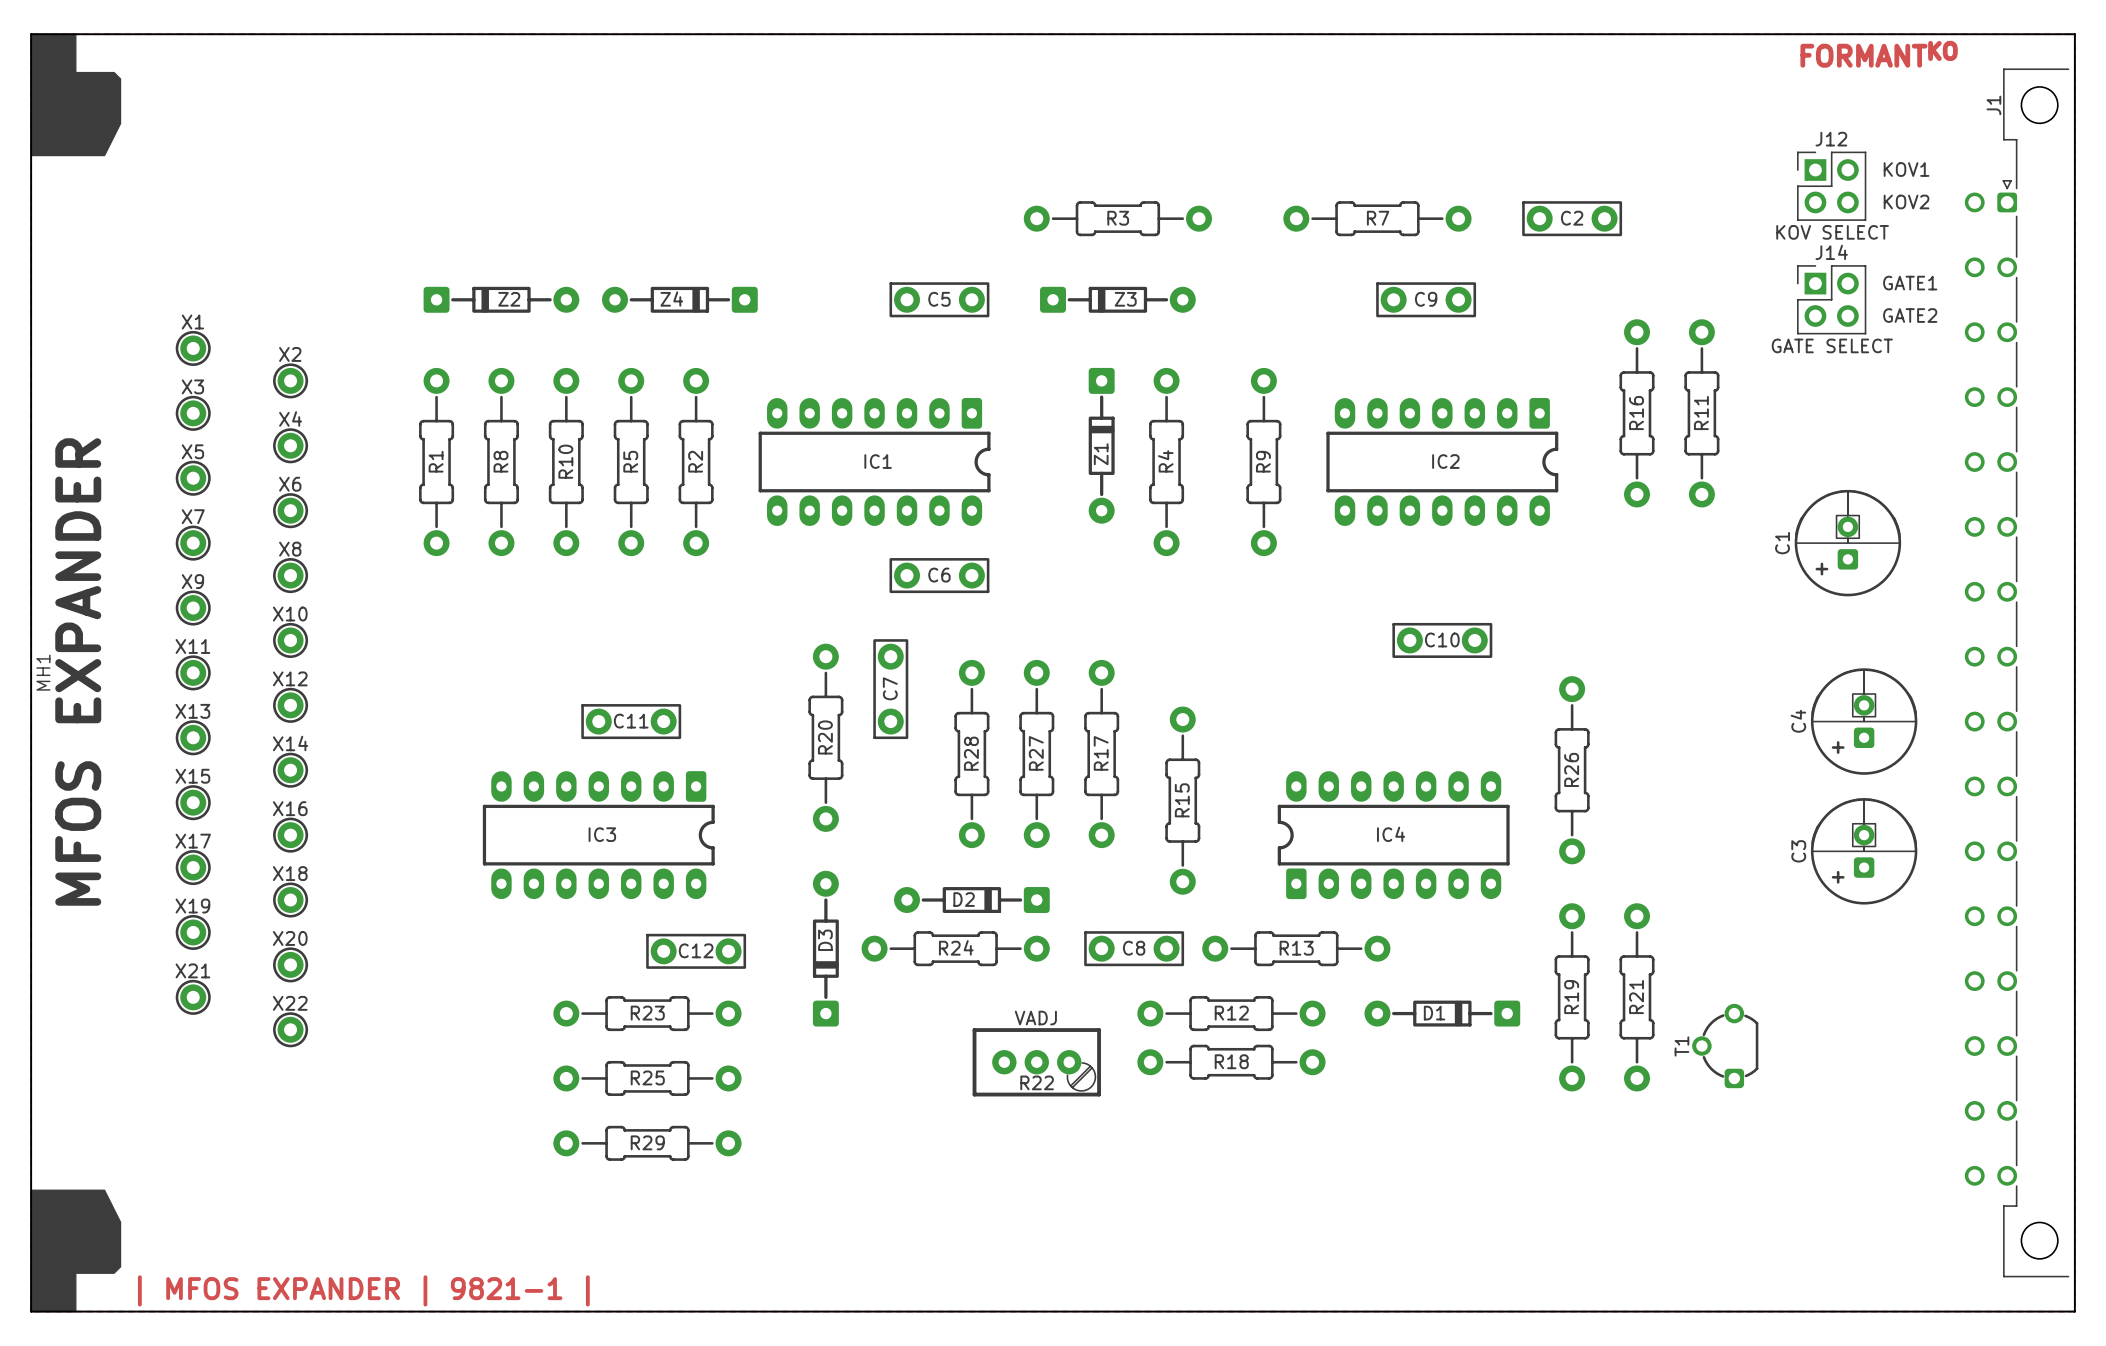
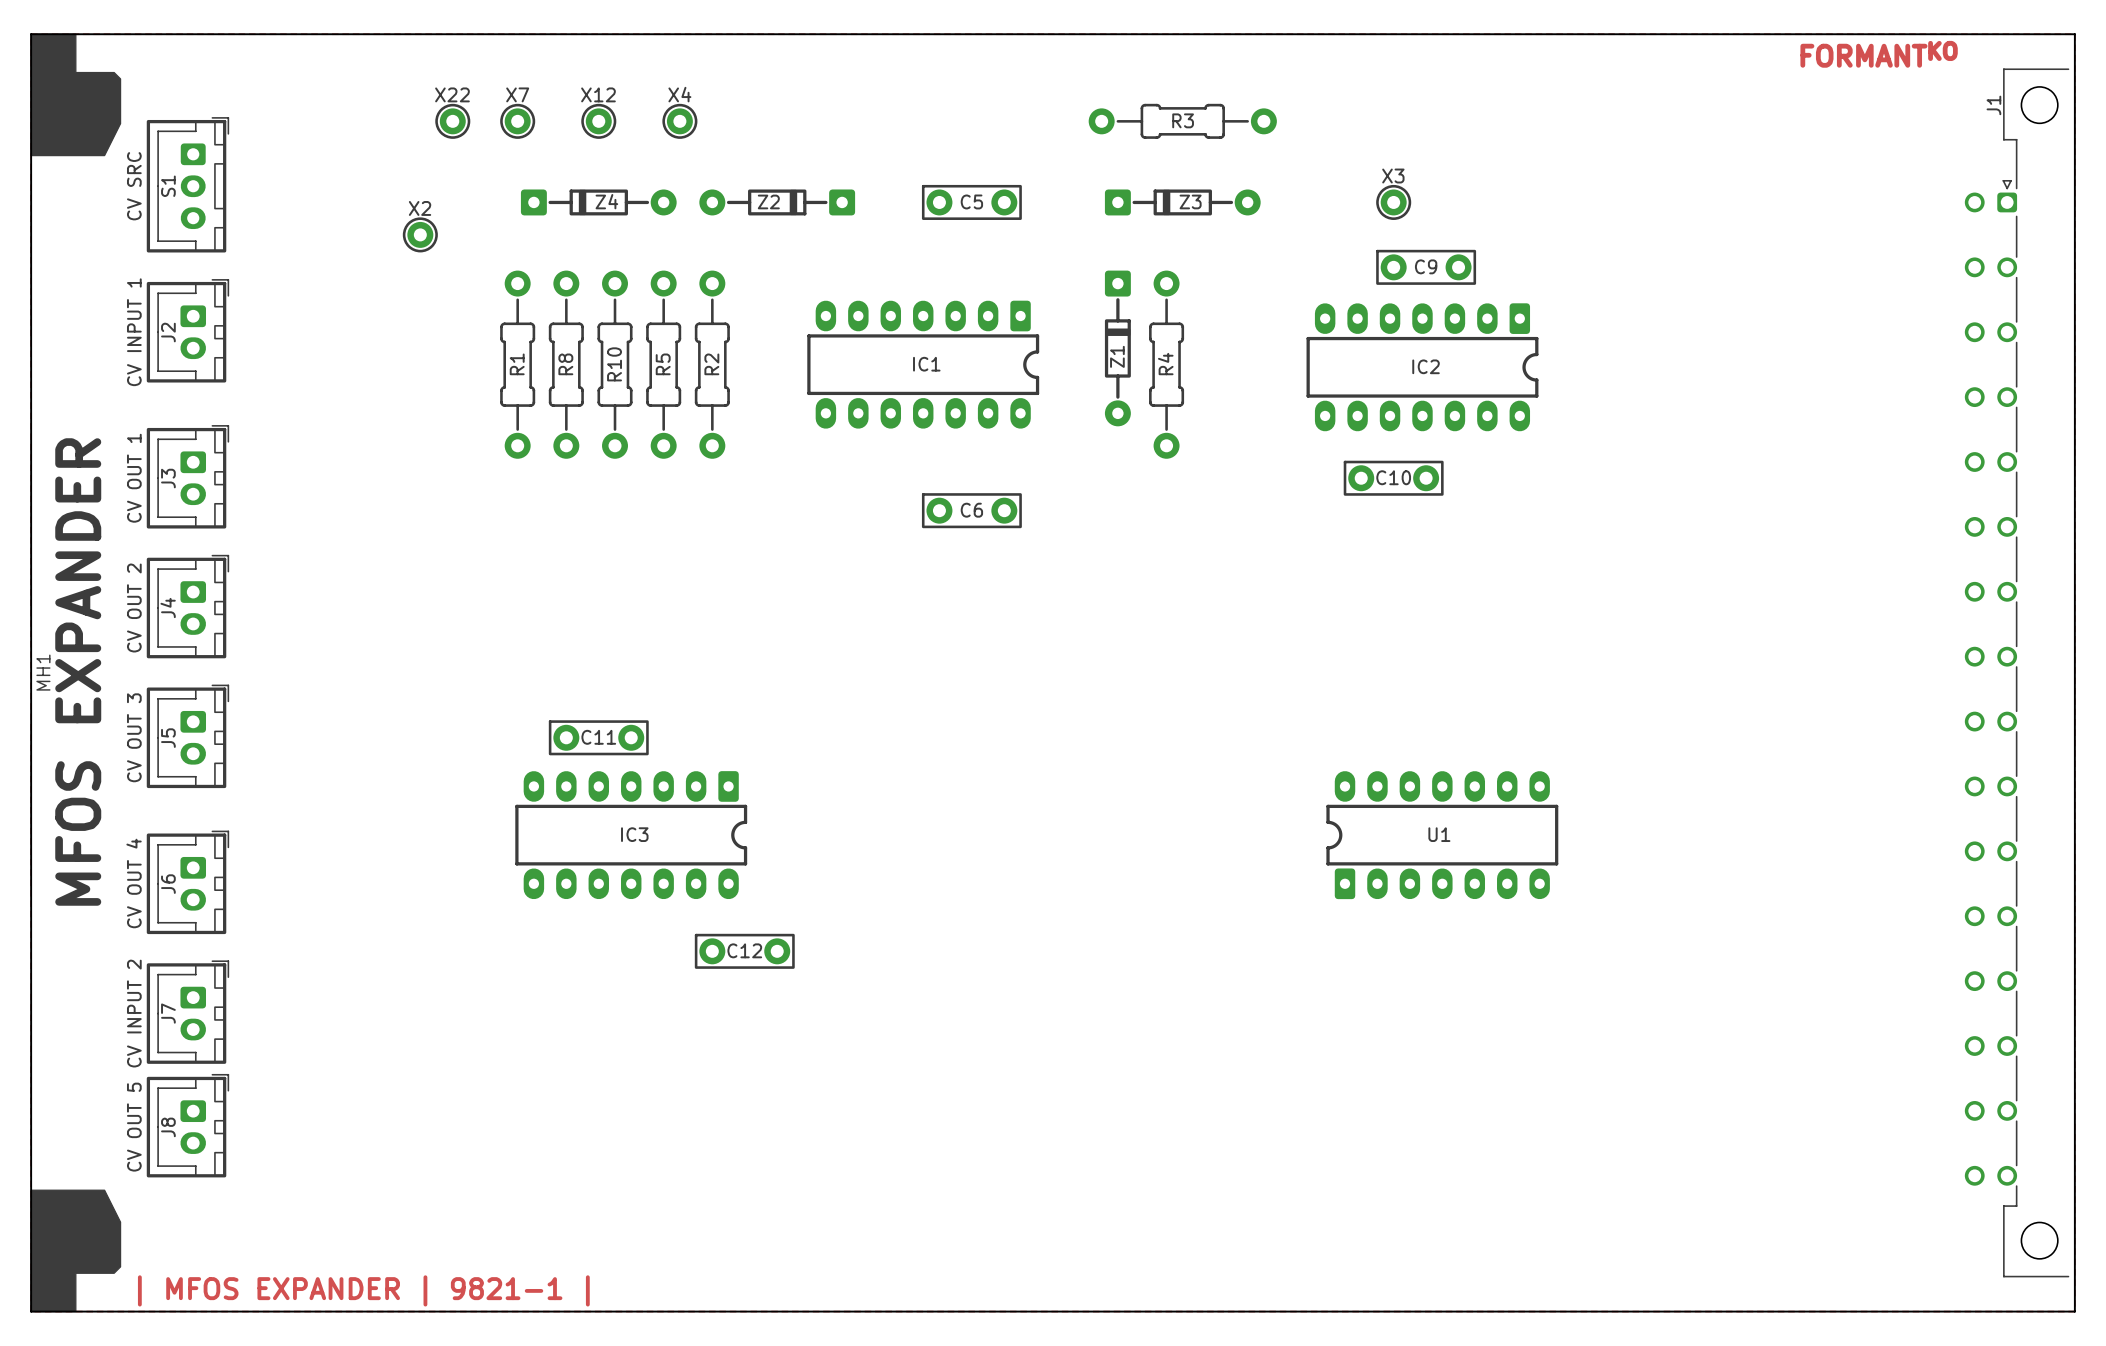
text: KOV1 (1906, 169) -> none
S1: none -> (187, 184)
J12: KOV SELECT (1831, 186) -> none
text: KOV2 (1906, 201) -> none
R3 position: (1117, 218) -> (1182, 121)
R7: (1377, 218) -> none
C2: (1572, 218) -> none
text: GATE1 (1910, 283) -> none
Z2 rotation: 0° (501, 299) -> 180° (777, 202)
Z2 position: (501, 299) -> (777, 202)
Z4 rotation: 0° (679, 299) -> 180° (598, 202)
Z4 position: (679, 299) -> (598, 202)
C5 position: (939, 299) -> (971, 202)
Z3 position: (1117, 299) -> (1182, 202)
C9 position: (1426, 299) -> (1426, 267)
J14: GATE SELECT (1831, 299) -> none
text: GATE2 (1910, 315) -> none
J2: none -> (187, 330)
X1: (193, 348) -> none
X2 position: (290, 380) -> (420, 234)
X3 position: (193, 413) -> (1393, 202)
R16: (1637, 413) -> none
R11: (1701, 413) -> none
X4 position: (290, 445) -> (679, 121)
Z1 position: (1101, 445) -> (1117, 348)
R1 position: (436, 462) -> (517, 364)
R8 position: (501, 462) -> (566, 364)
R10 position: (566, 462) -> (615, 364)
R5 position: (631, 462) -> (663, 364)
R2 position: (696, 462) -> (712, 364)
IC1 position: (874, 462) -> (923, 364)
R4 position: (1166, 462) -> (1166, 364)
R9: (1263, 462) -> none
IC2 position: (1442, 462) -> (1422, 367)
J3: none -> (187, 476)
X5: (193, 478) -> none
X6: (290, 510) -> none
X7 position: (193, 543) -> (517, 121)
C1: (1847, 543) -> none
X8: (290, 575) -> none
C6 position: (939, 575) -> (971, 510)
J4: none -> (187, 606)
X9: (193, 608) -> none
X10: (290, 640) -> none
C10 position: (1442, 640) -> (1393, 478)
X11: (193, 672) -> none
C7: (890, 689) -> none
X12 position: (290, 705) -> (598, 121)
C11 position: (631, 721) -> (598, 737)
C4: (1864, 721) -> none
J5: none -> (187, 736)
X13: (193, 737) -> none
R20: (825, 737) -> none
R28: (971, 754) -> none
R27: (1036, 754) -> none
R17: (1101, 754) -> none
X14: (290, 770) -> none
R26: (1572, 770) -> none
R15: (1182, 800) -> none
X15: (193, 802) -> none
X16: (290, 835) -> none
IC3 position: (598, 835) -> (631, 835)
IC4: (1393, 835) -> none
U1: none -> (1442, 835)
C3: (1864, 851) -> none
X17: (193, 867) -> none
J6: none -> (187, 882)
X18: (290, 900) -> none
D2: (971, 900) -> none
X19: (193, 932) -> none
D3: (825, 948) -> none
R24: (955, 948) -> none
C8: (1134, 948) -> none
R13: (1296, 948) -> none
C12 position: (696, 951) -> (744, 951)
X20: (290, 964) -> none
X21: (193, 997) -> none
R19: (1572, 997) -> none
R21: (1637, 997) -> none
J7: none -> (187, 1012)
R23: (647, 1013) -> none
R12: (1231, 1013) -> none
D1: (1442, 1013) -> none
X22 position: (290, 1029) -> (452, 121)
T1: (1725, 1046) -> none
R22: (1036, 1062) -> none
R18: (1231, 1062) -> none
R25: (647, 1078) -> none
J8: none -> (187, 1125)
R29: (647, 1143) -> none

